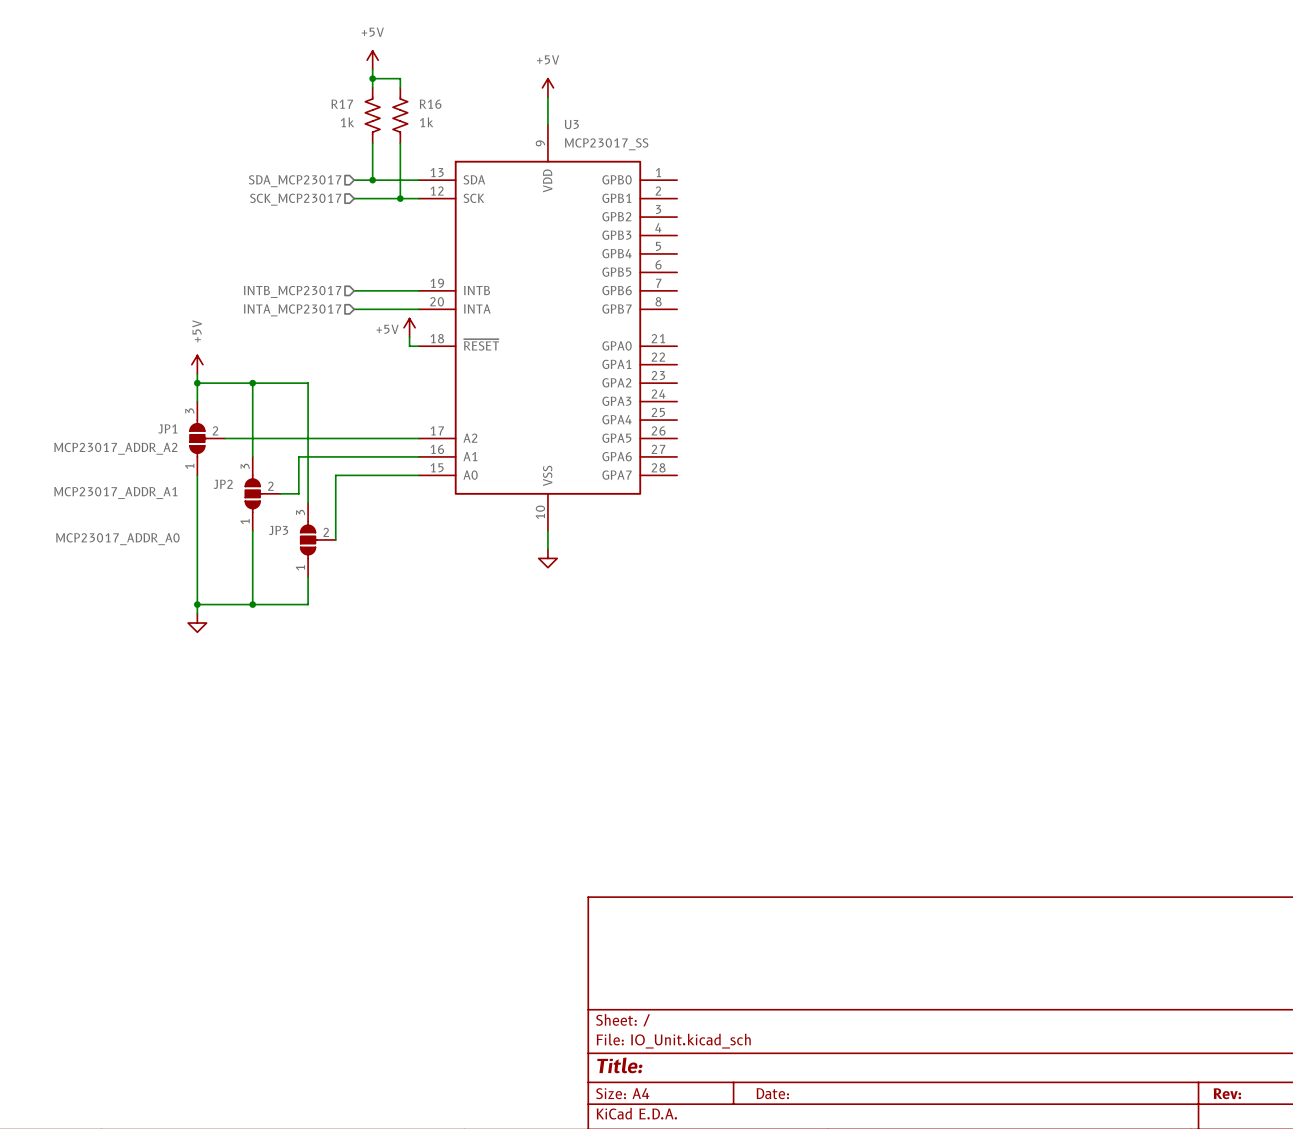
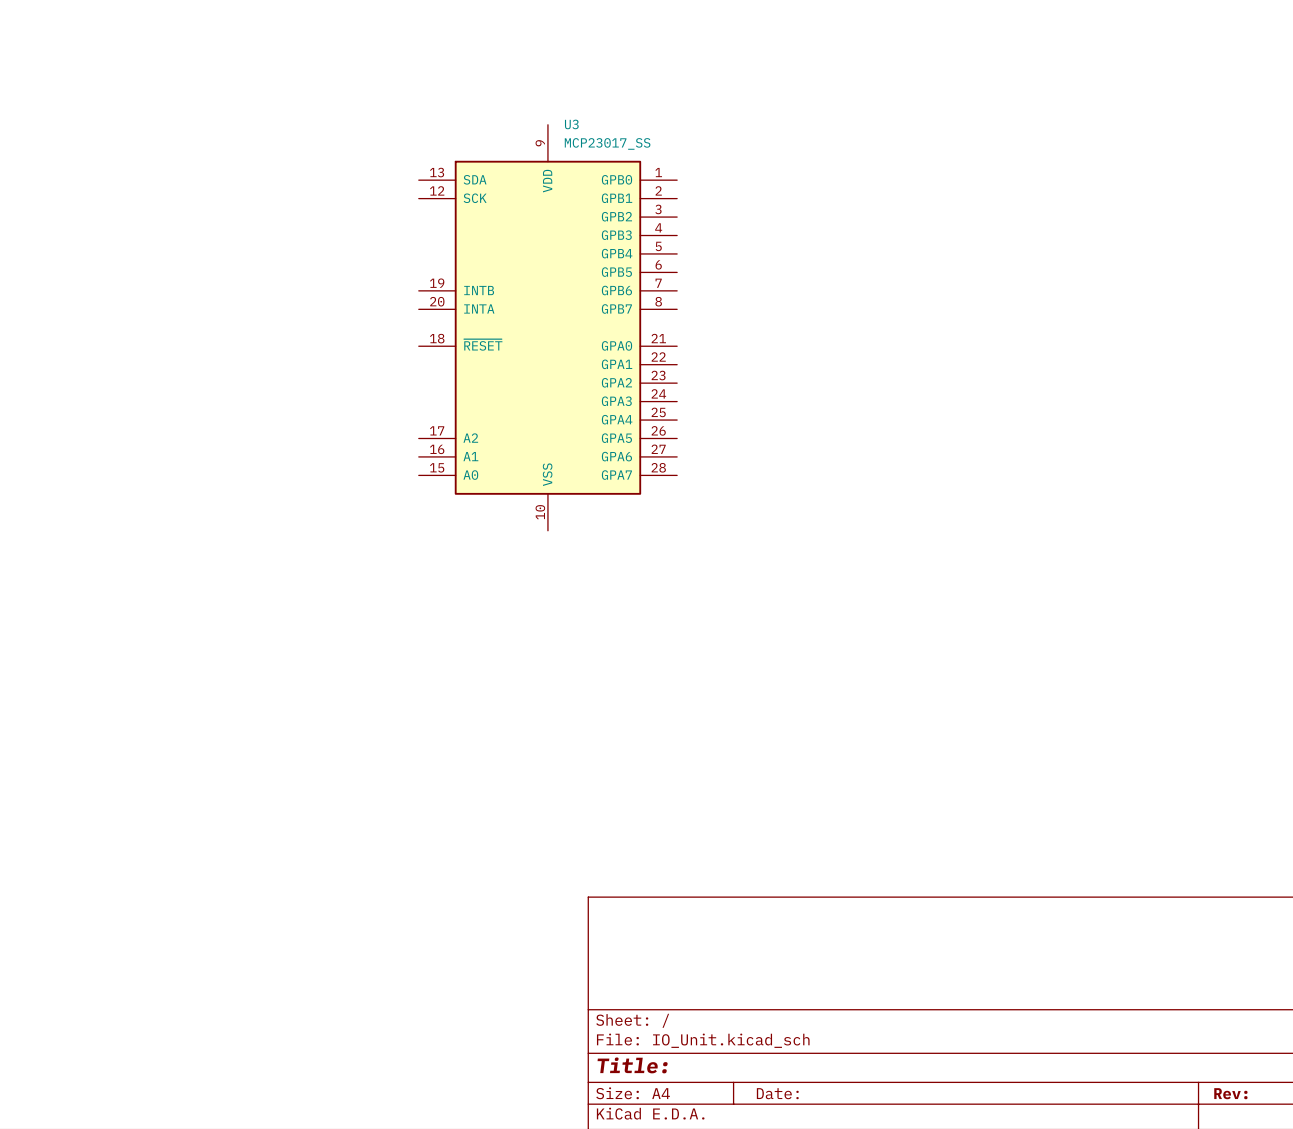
power symbol: +5V (372, 60) -> none
wire: (372, 69) (372, 87) -> none
wire: (372, 78) (400, 78) (400, 87) -> none
junction: (372, 78) -> none
power symbol: +5V (547, 87) -> none
wire: (547, 97) (547, 124) -> none
R17: 1k (372, 115) -> none
R16: 1k (400, 115) -> none
wire: (372, 143) (372, 180) -> none
wire: (400, 143) (400, 198) -> none
wire: (354, 180) (418, 180) -> none
junction: (372, 180) -> none
hierarchical label: SDA_MCP23017 (295, 181) -> none
wire: (354, 198) (418, 198) -> none
junction: (400, 198) -> none
hierarchical label: SCK_MCP23017 (295, 199) -> none
wire: (354, 290) (418, 290) -> none
hierarchical label: INTB_MCP23017 (292, 291) -> none
wire: (354, 309) (418, 309) -> none
hierarchical label: INTA_MCP23017 (292, 310) -> none
power symbol: +5V (409, 327) -> none
wire: (409, 337) (409, 346) (418, 346) -> none
power symbol: +5V (197, 364) -> none
wire: (197, 373) (197, 401) -> none
wire: (197, 383) (308, 383) (308, 503) -> none
junction: (197, 383) -> none
wire: (252, 383) (252, 456) -> none
junction: (252, 383) -> none
JP1: MCP23017_ADDR_A2 (207, 438) -> none
wire: (225, 438) (418, 438) -> none
wire: (418, 456) (298, 456) (298, 493) (280, 493) -> none
wire: (197, 475) (197, 613) -> none
wire: (418, 475) (335, 475) (335, 539) -> none
JP2: MCP23017_ADDR_A1 (262, 493) -> none
wire: (252, 530) (252, 604) -> none
wire: (547, 530) (547, 549) -> none
JP3: MCP23017_ADDR_A0 (318, 539) -> none
power symbol: (547, 558) -> none
wire: (308, 576) (308, 604) (197, 604) -> none
junction: (197, 604) -> none
junction: (252, 604) -> none
power symbol: (197, 623) -> none

